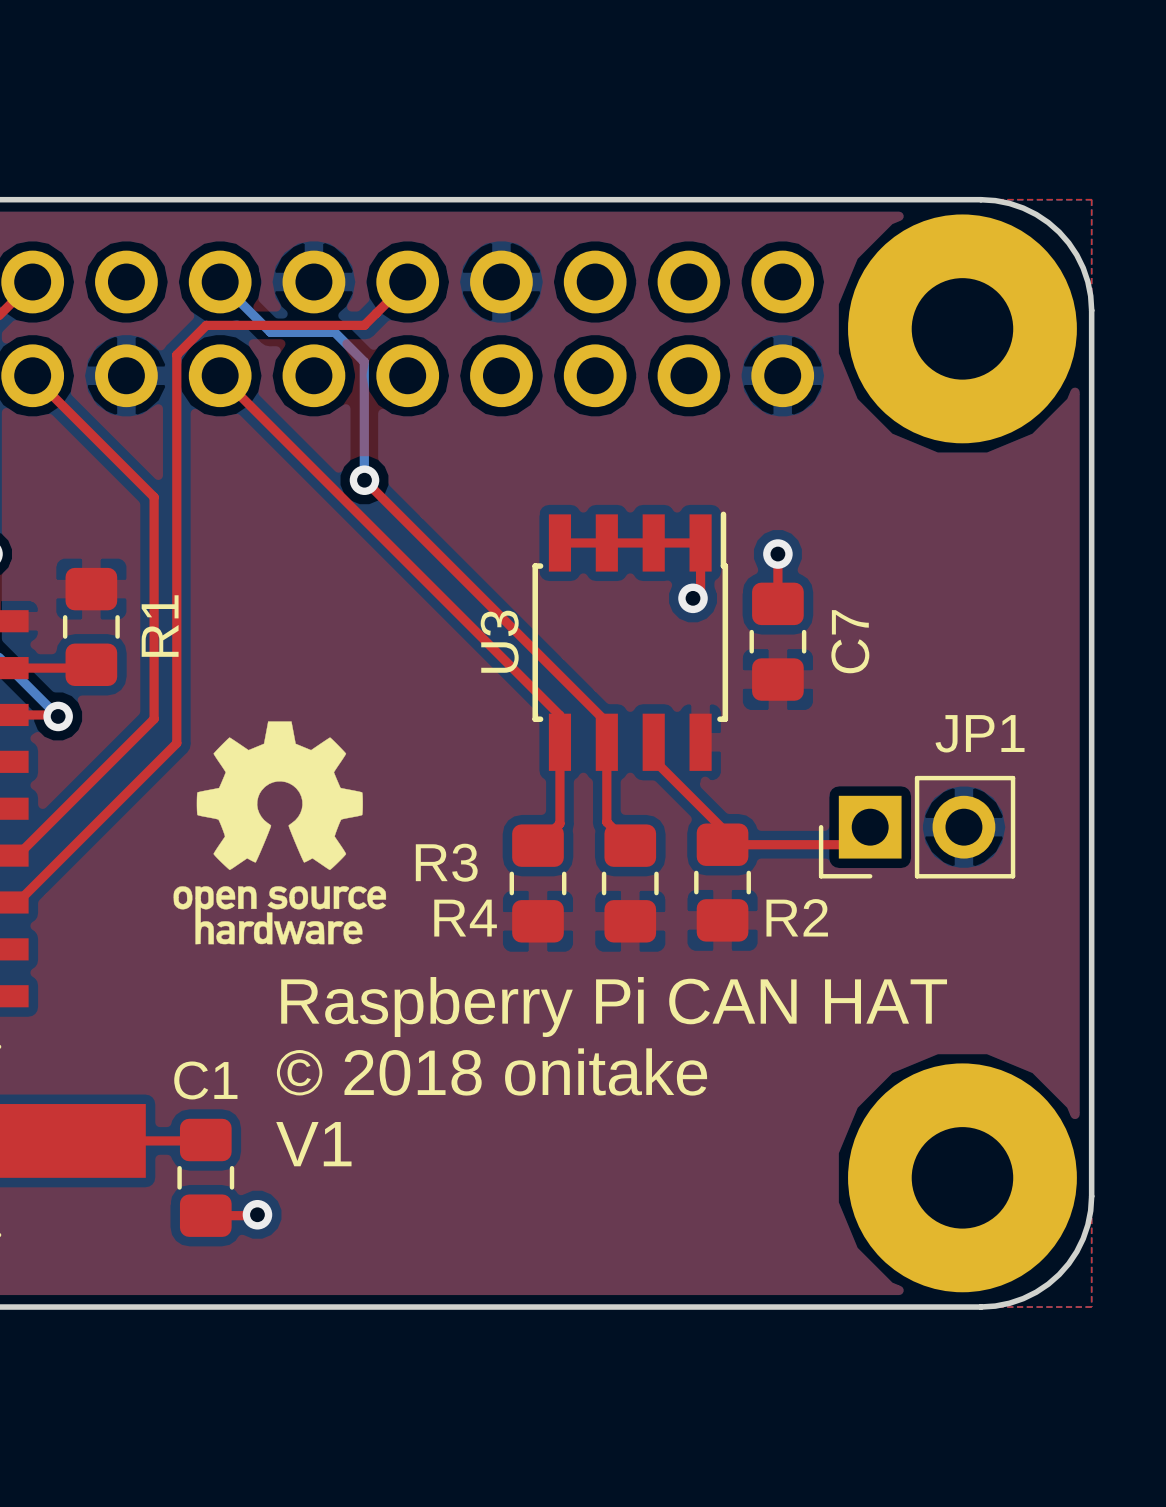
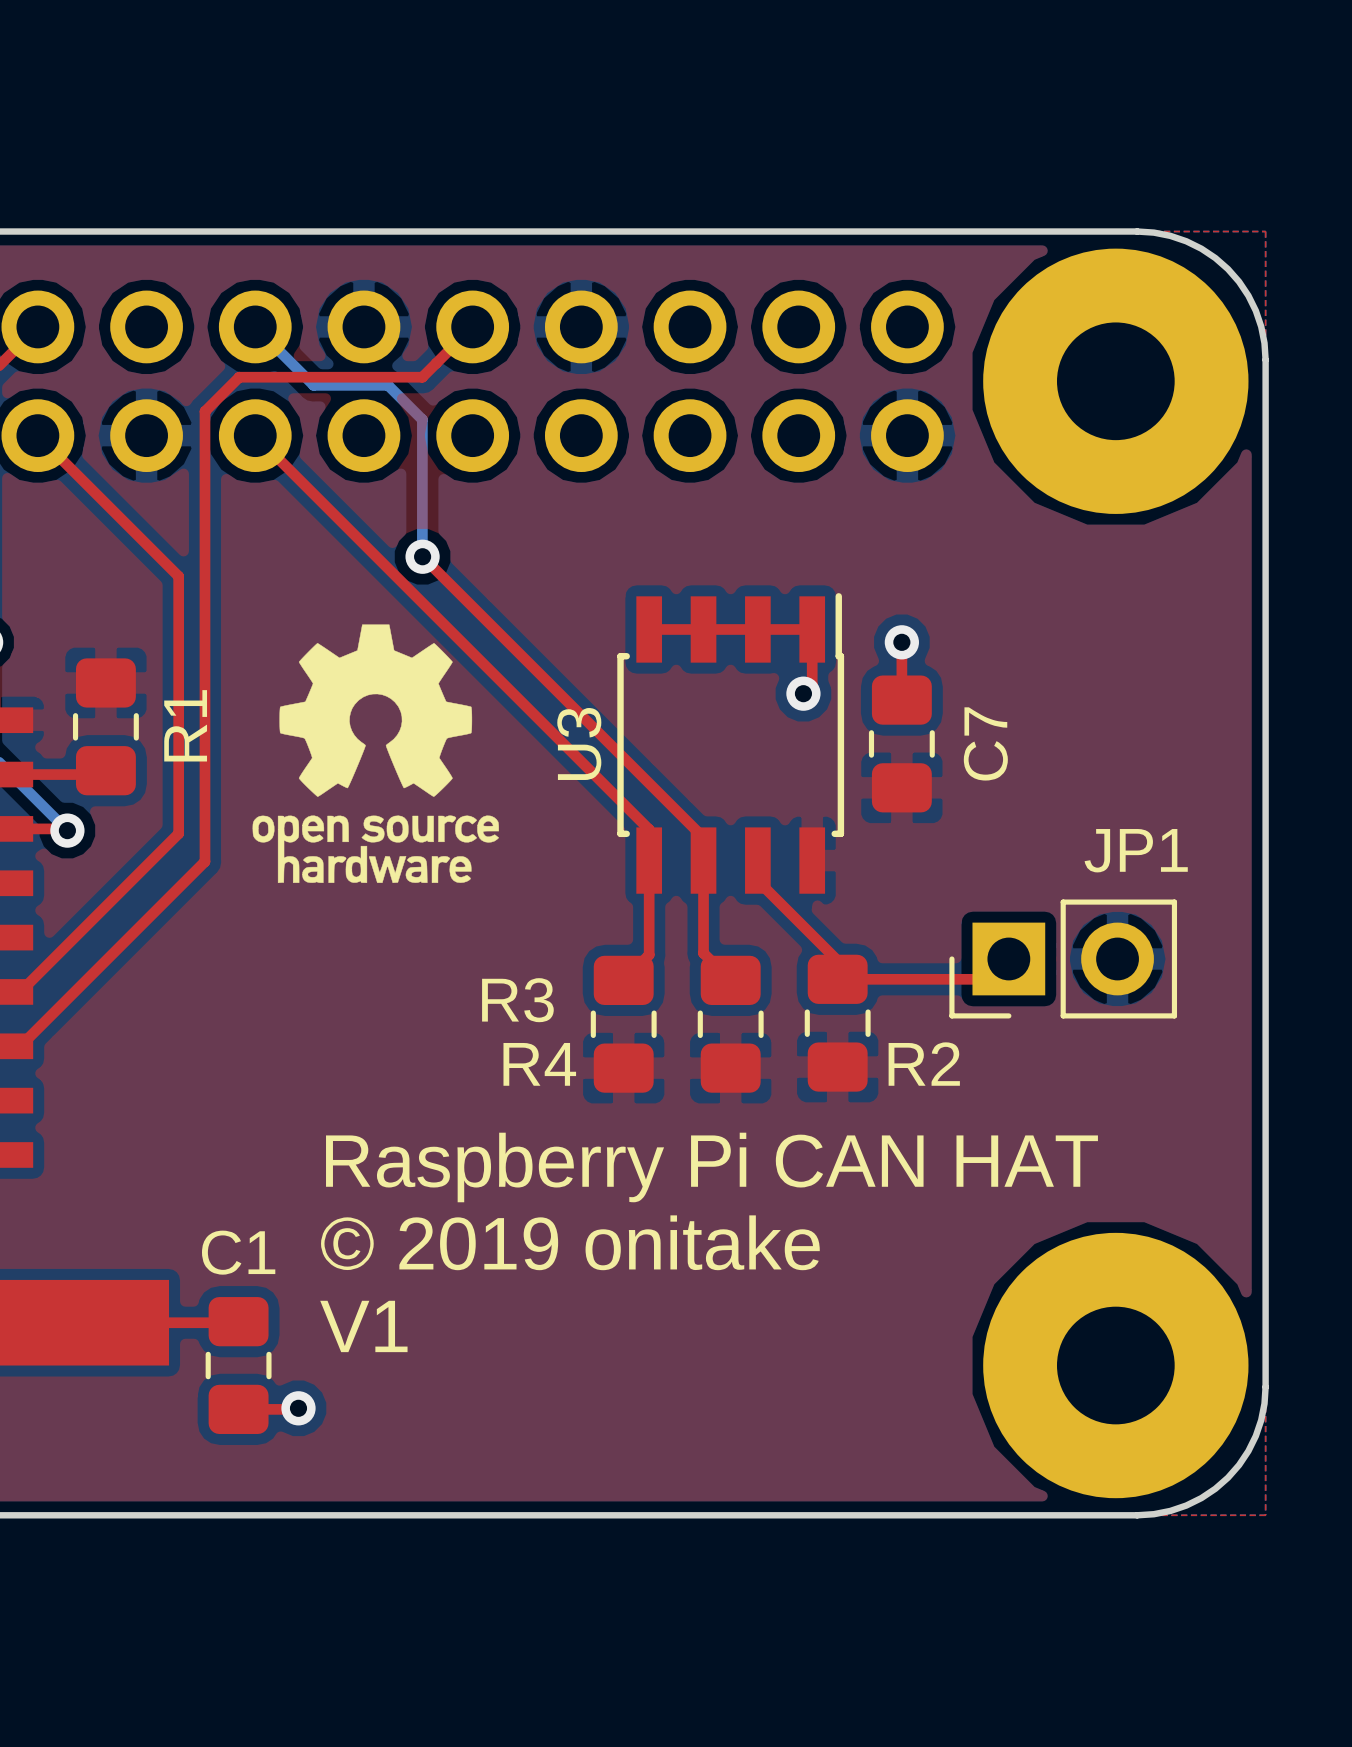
drawing position: (279, 832) -> (375, 753)
text: © 2018 onitake (492, 1071) -> © 2019 onitake (570, 1242)

